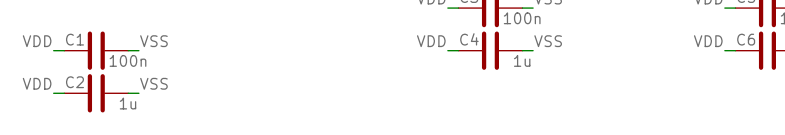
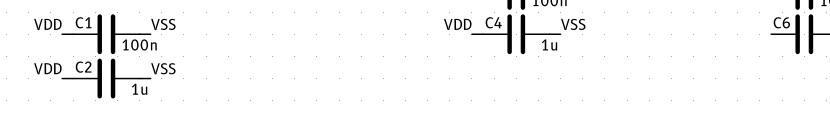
label: VDD (708, 41) -> none
wire: (724, 50) (735, 50) -> none

